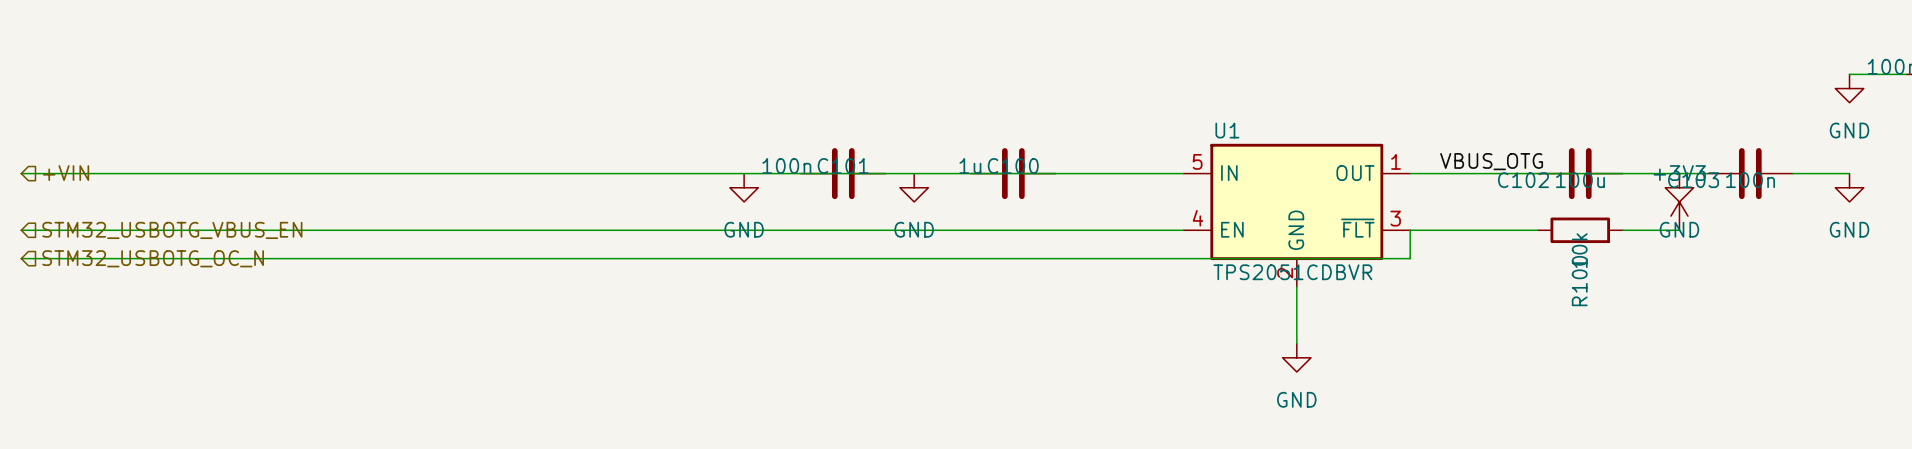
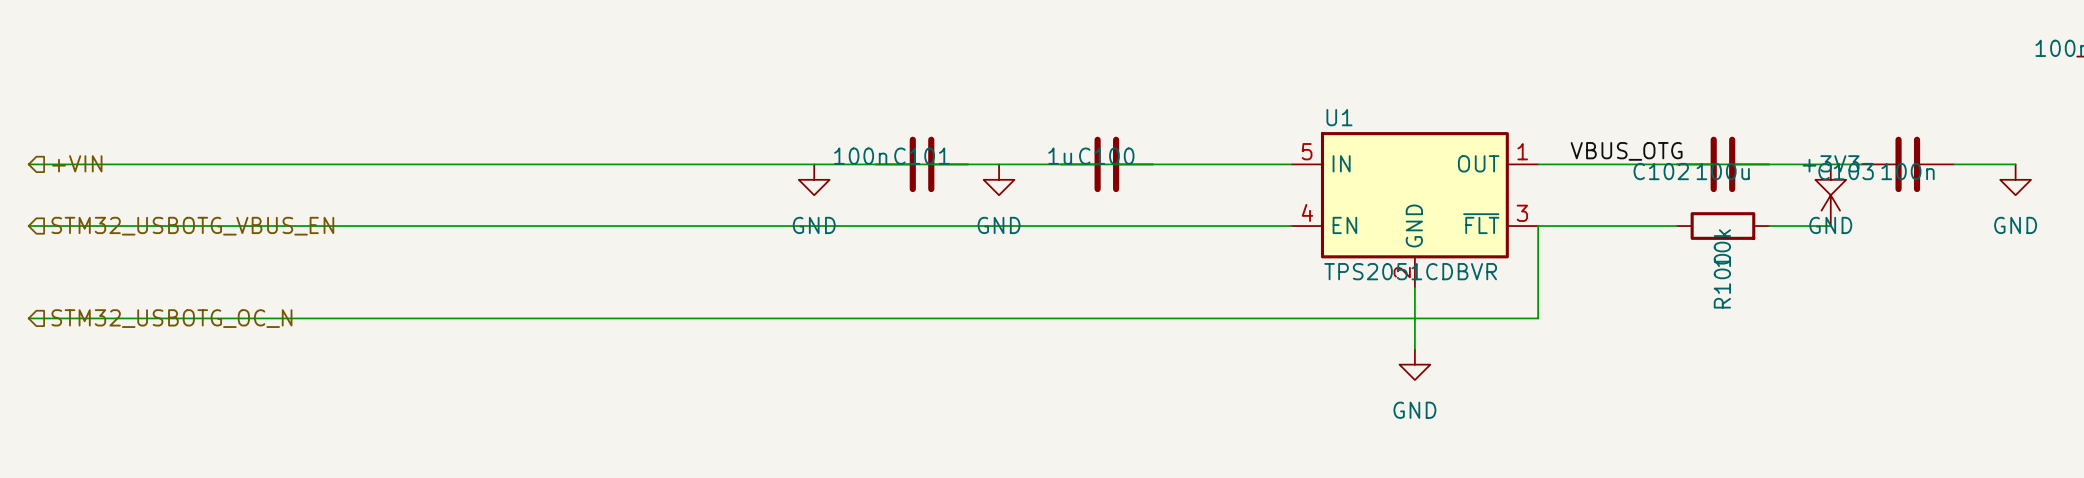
wire: (1849, 74) (1906, 74) -> none
power symbol: GND (1849, 88) -> none
wire: (21, 258) (1410, 258) -> (28, 318) (1538, 318) (1538, 256)
hierarchical label position: STM32_USBOTG_OC_N (153, 258) -> STM32_USBOTG_OC_N (171, 318)

